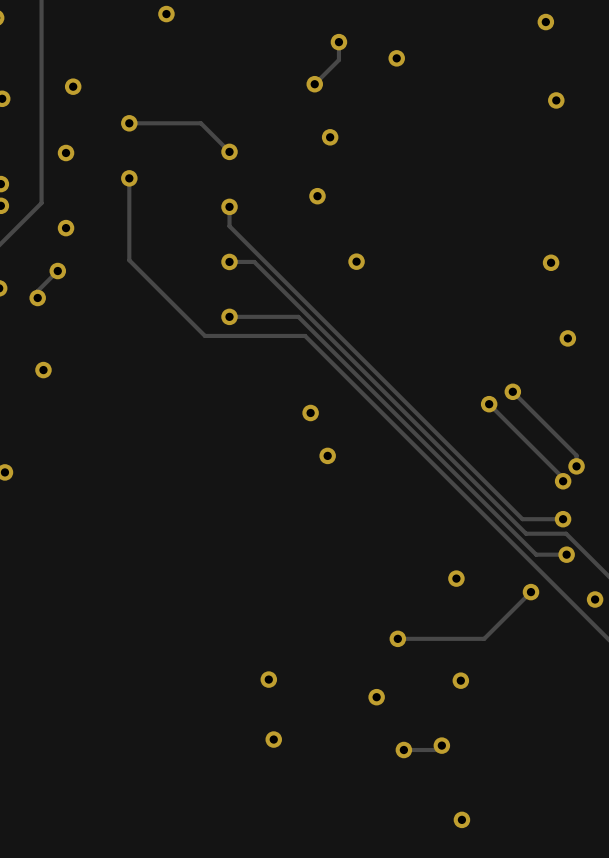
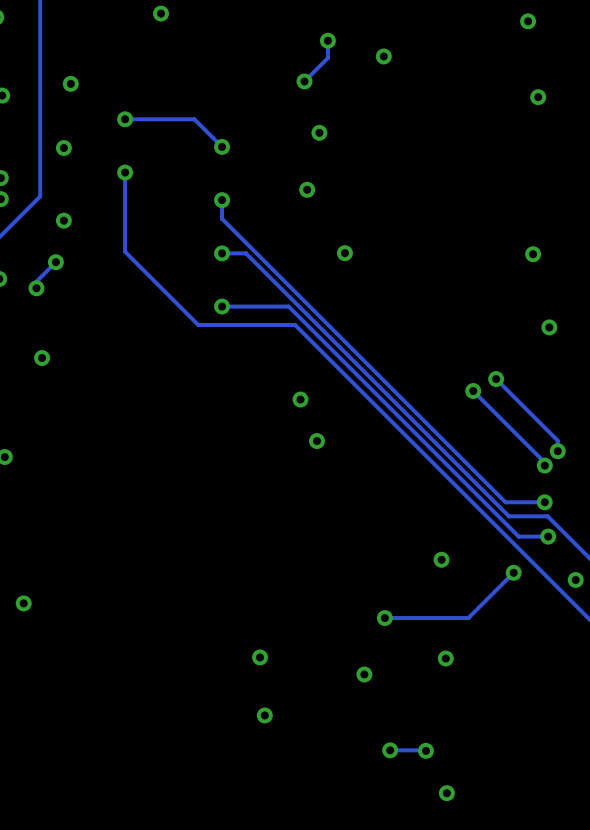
via: none -> (23, 603)
track: (441, 745) (437, 750) (403, 750) -> none
via: (441, 745) -> none
via: (403, 750) -> none
track: none -> (390, 750) (425, 750)
via: none -> (390, 750)
via: none -> (425, 750)

